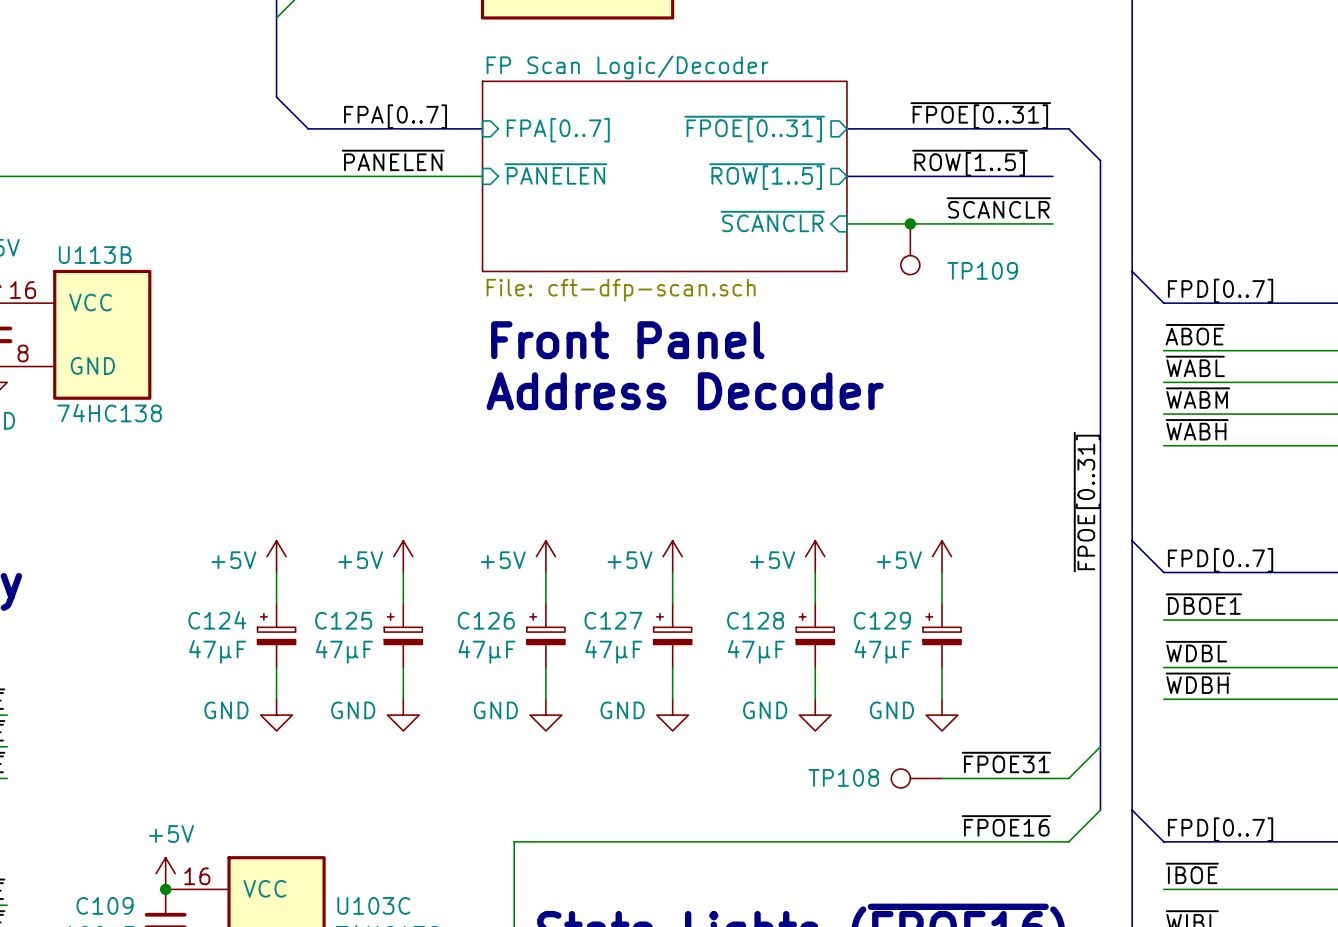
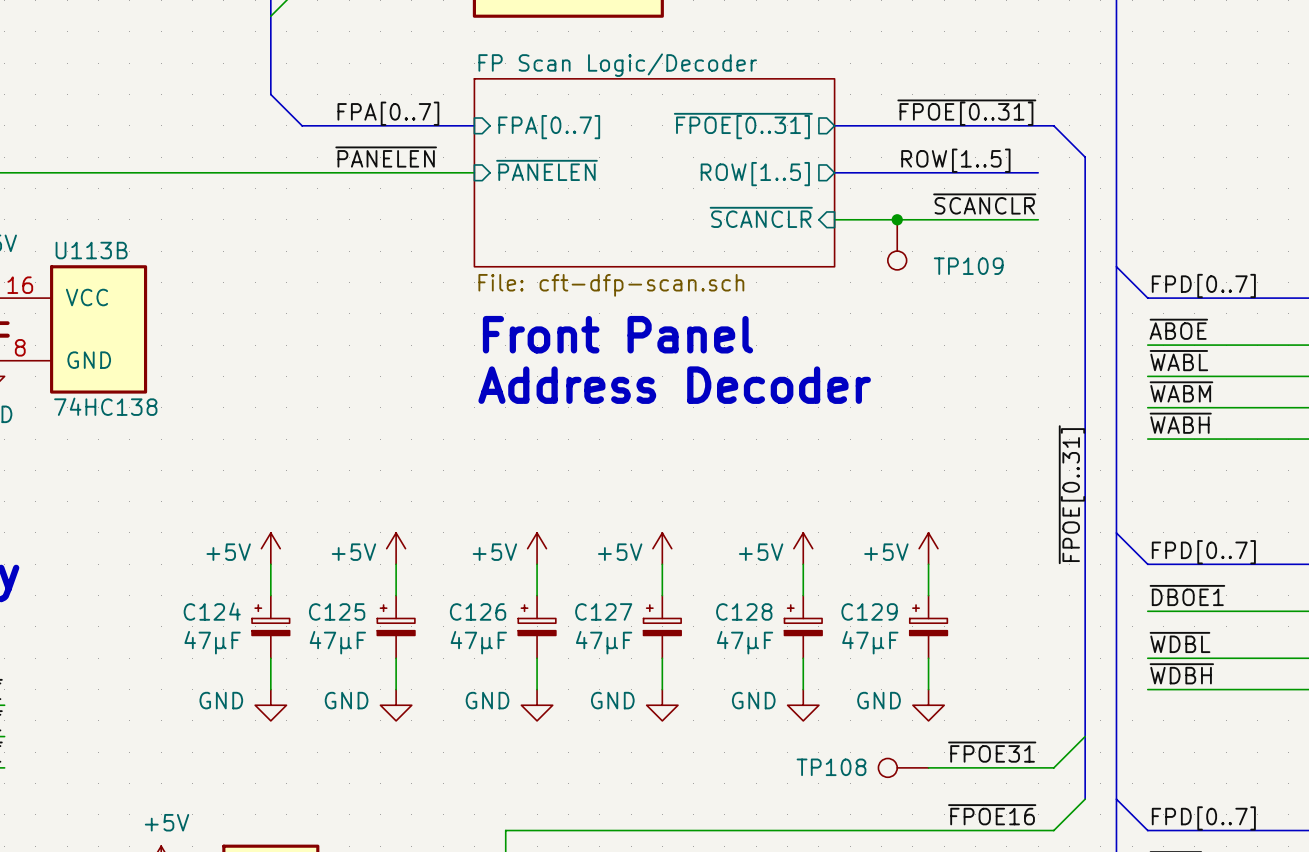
label: ~{ROW[1..5]} (970, 163) -> ROW[1..5] (955, 160)
sheet pin: ~{ROW[1..5]} (767, 176) -> ROW[1..5] (755, 174)

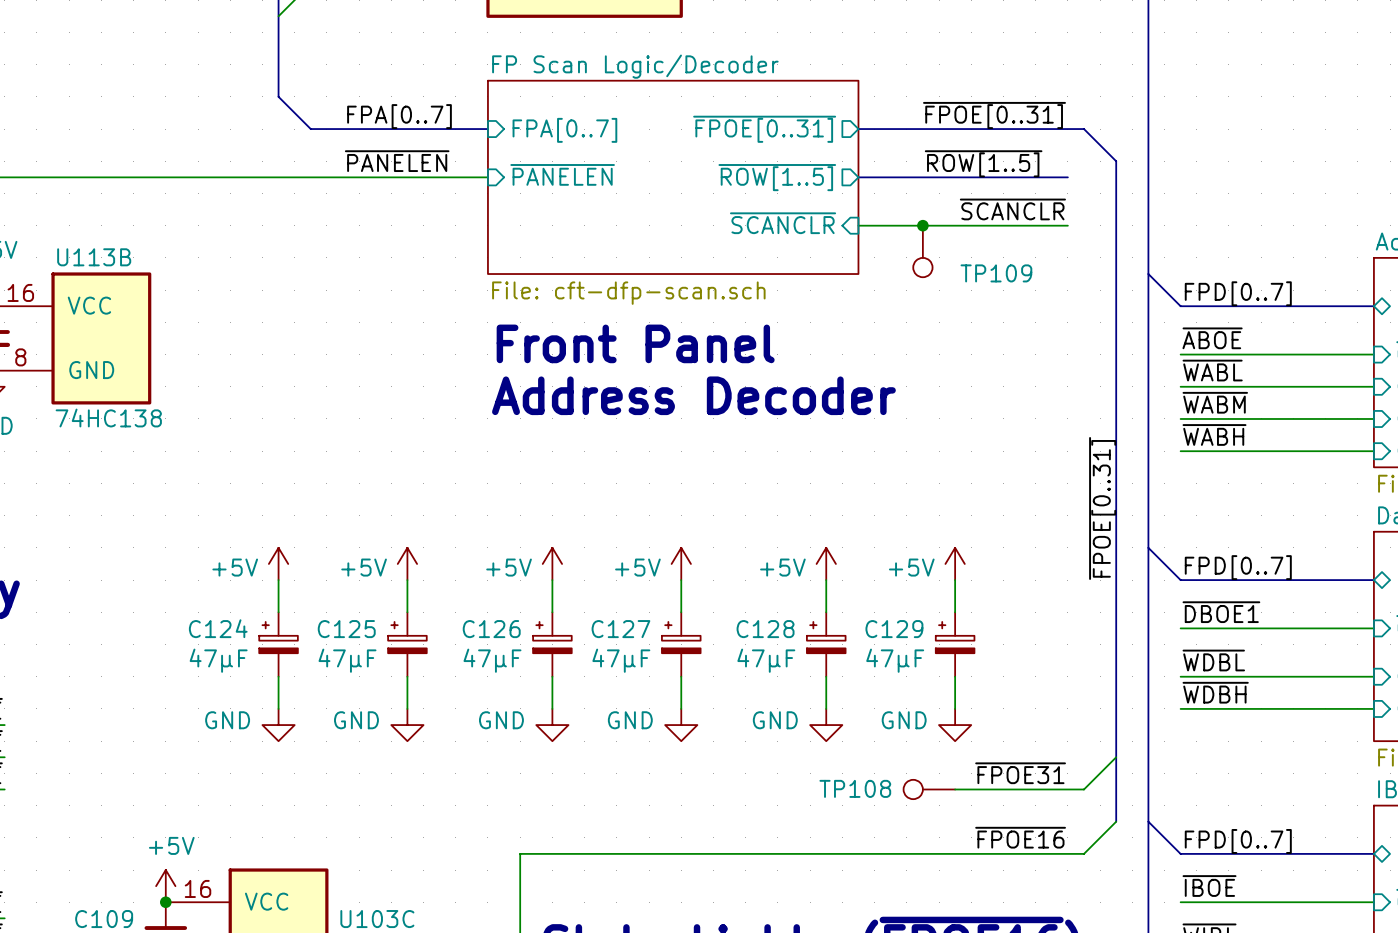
label: ROW[1..5] (955, 160) -> ~{ROW[1..5]} (983, 163)
sheet pin: ROW[1..5] (755, 174) -> ~{ROW[1..5]} (777, 177)

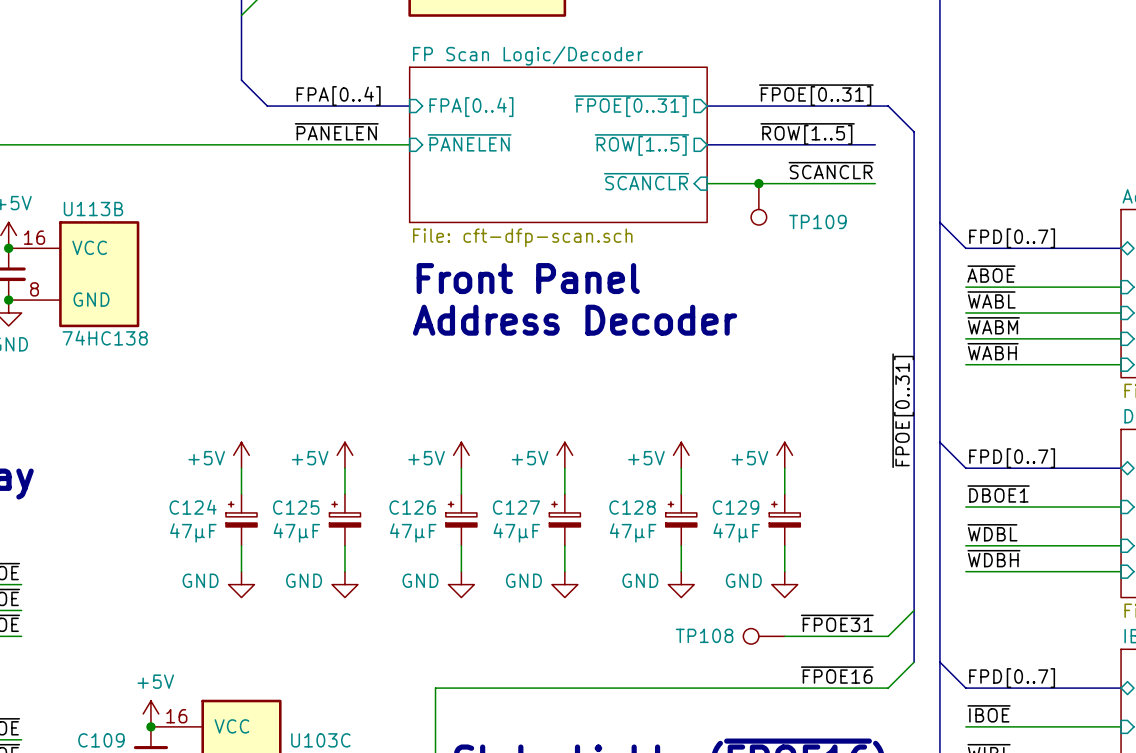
label: FPA[0..7] (399, 116) -> FPA[0..4] (338, 96)
sheet pin: FPA[0..7] (564, 130) -> FPA[0..4] (471, 107)

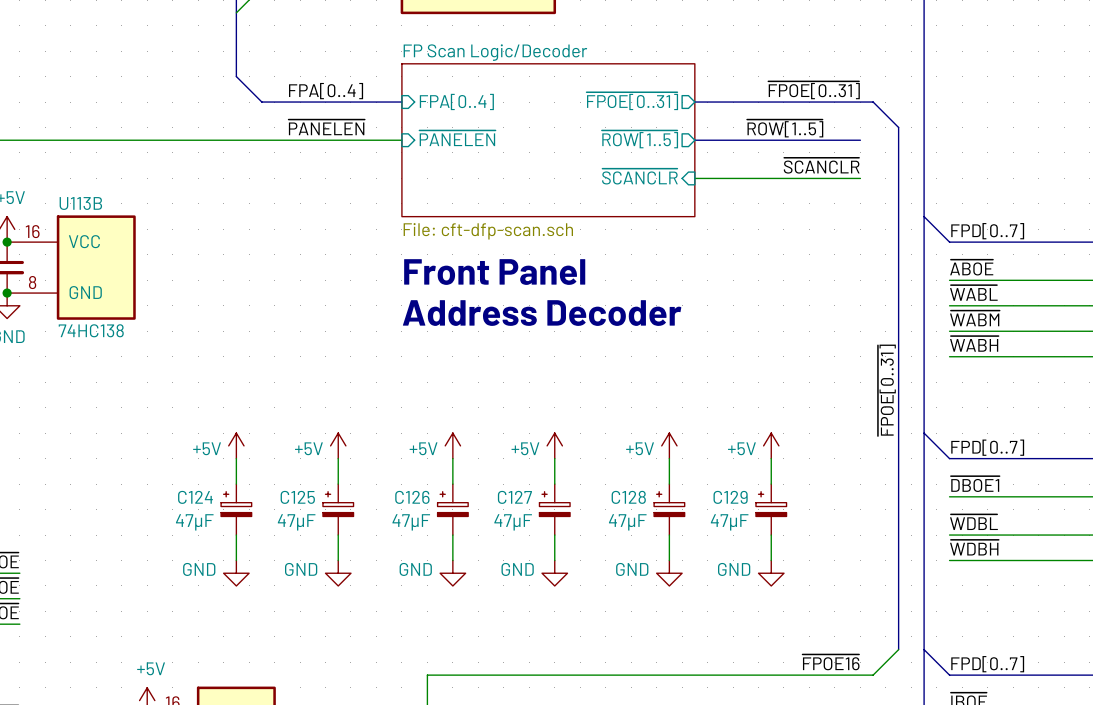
junction: (758, 183) -> none
TP109: (758, 204) -> none
wire: (914, 610) (888, 636) (784, 636) -> none
label: ~{FPOE31} (837, 623) -> none
TP108: (764, 636) -> none

